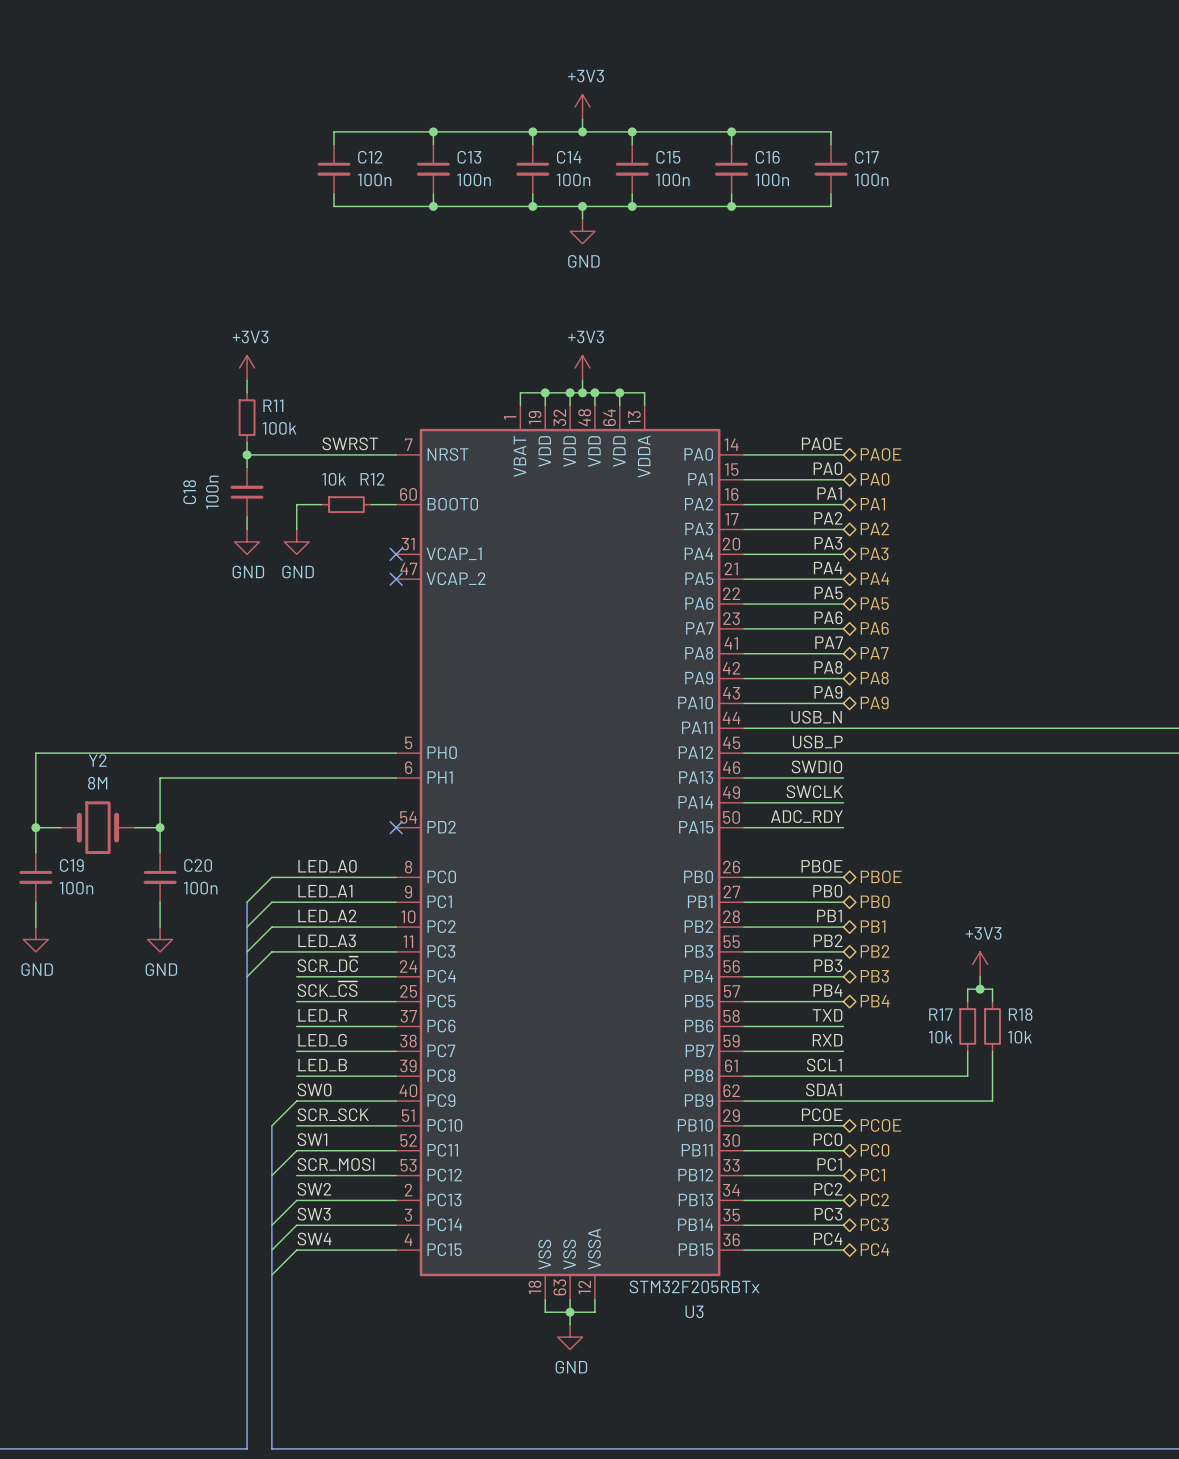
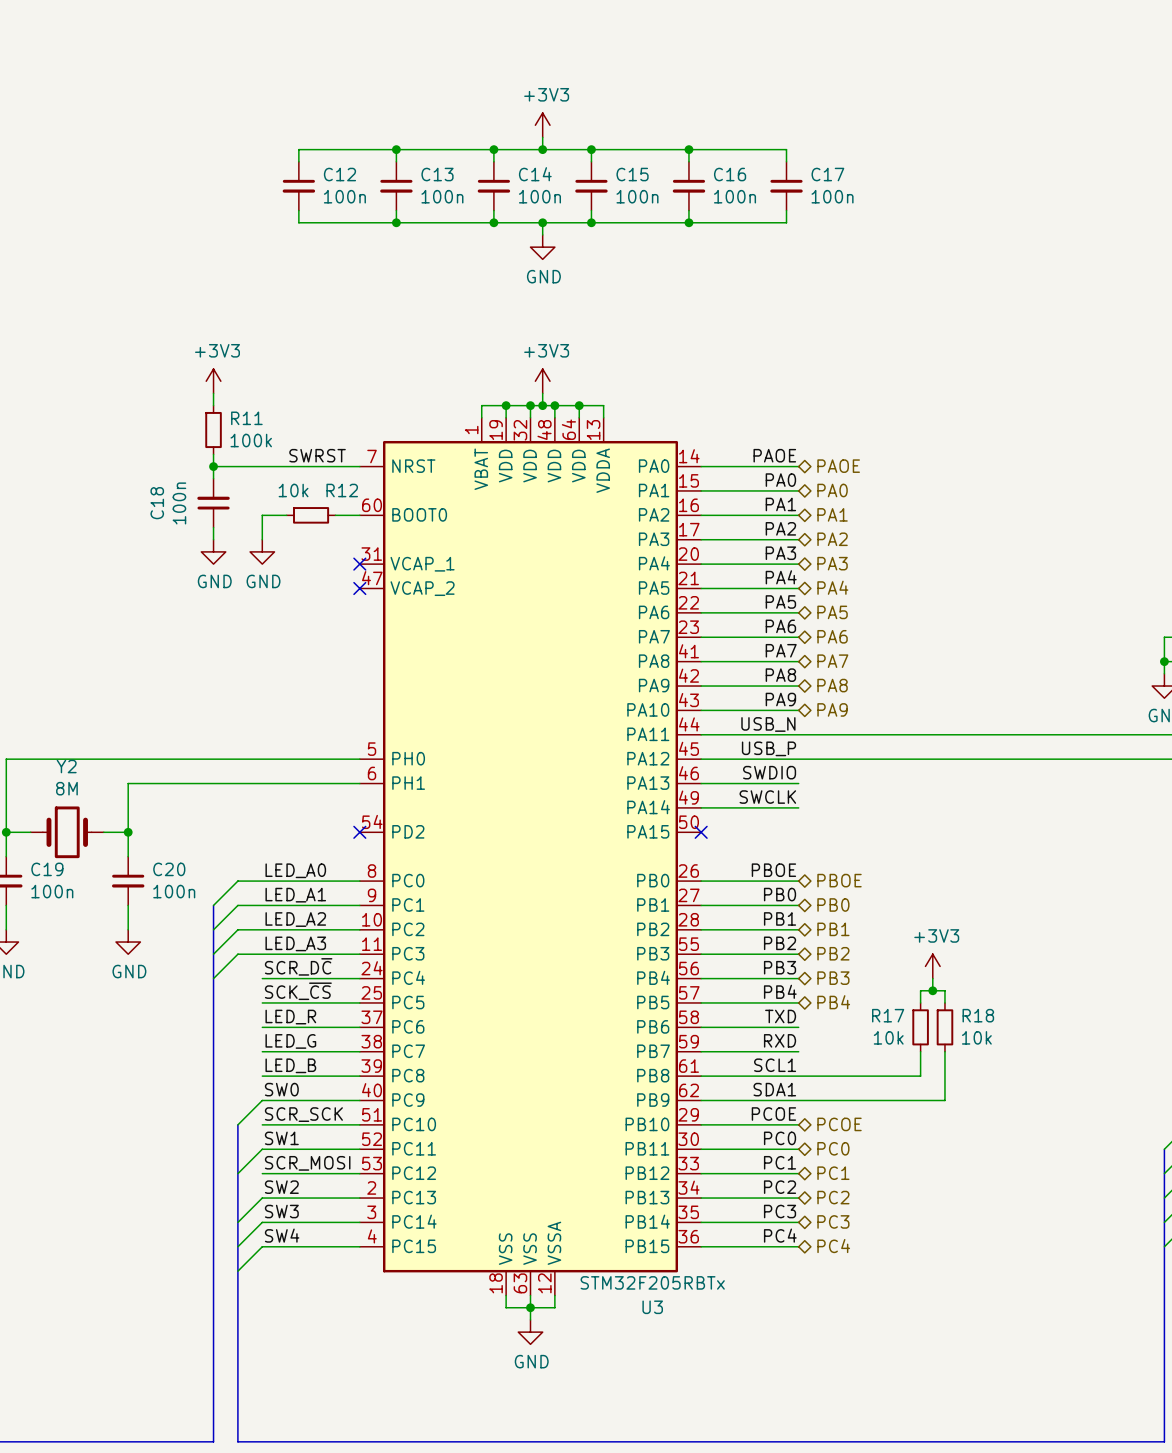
label: ADC_RDY (806, 816) -> none
wire: (744, 827) (843, 827) -> none
no-connect mark: none -> (701, 832)

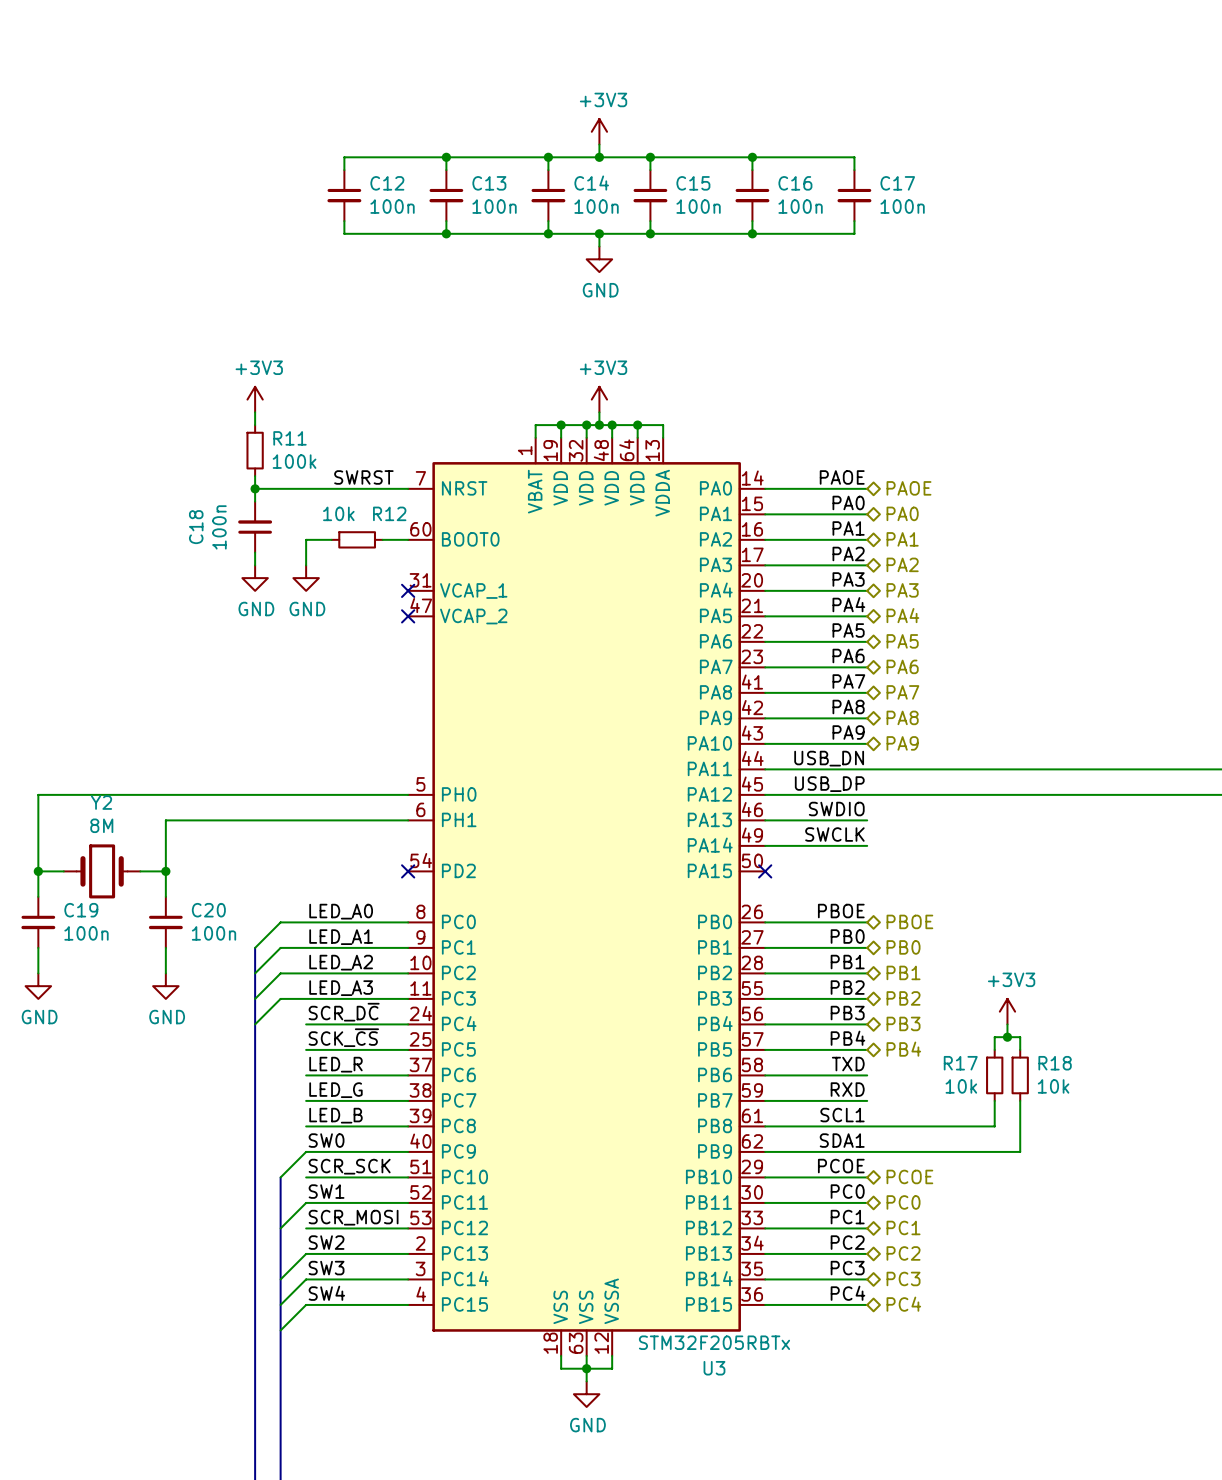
label: USB_N (768, 724) -> USB_DN (829, 758)
label: USB_P (768, 748) -> USB_DP (829, 784)

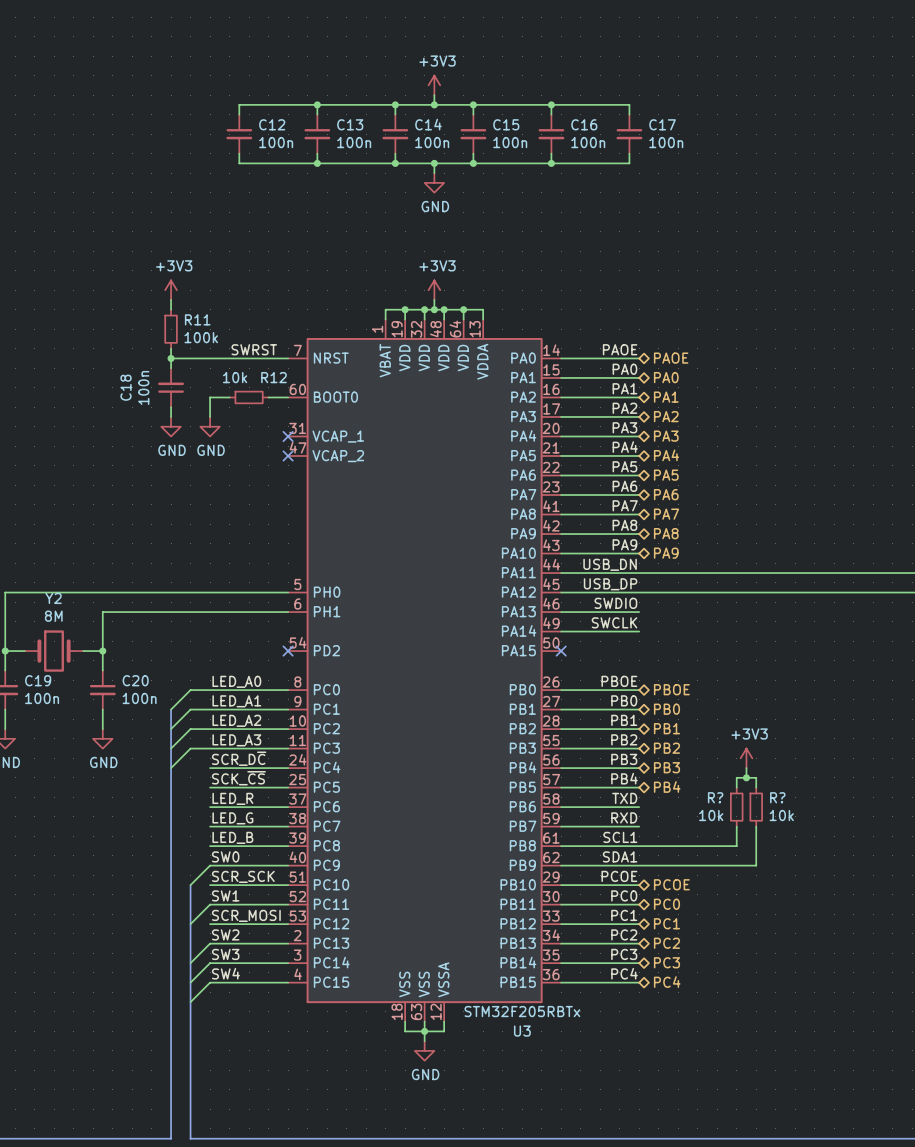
R17 name: R17 (960, 1063) -> R? (715, 797)
R18 name: R18 (1055, 1063) -> R? (777, 797)

